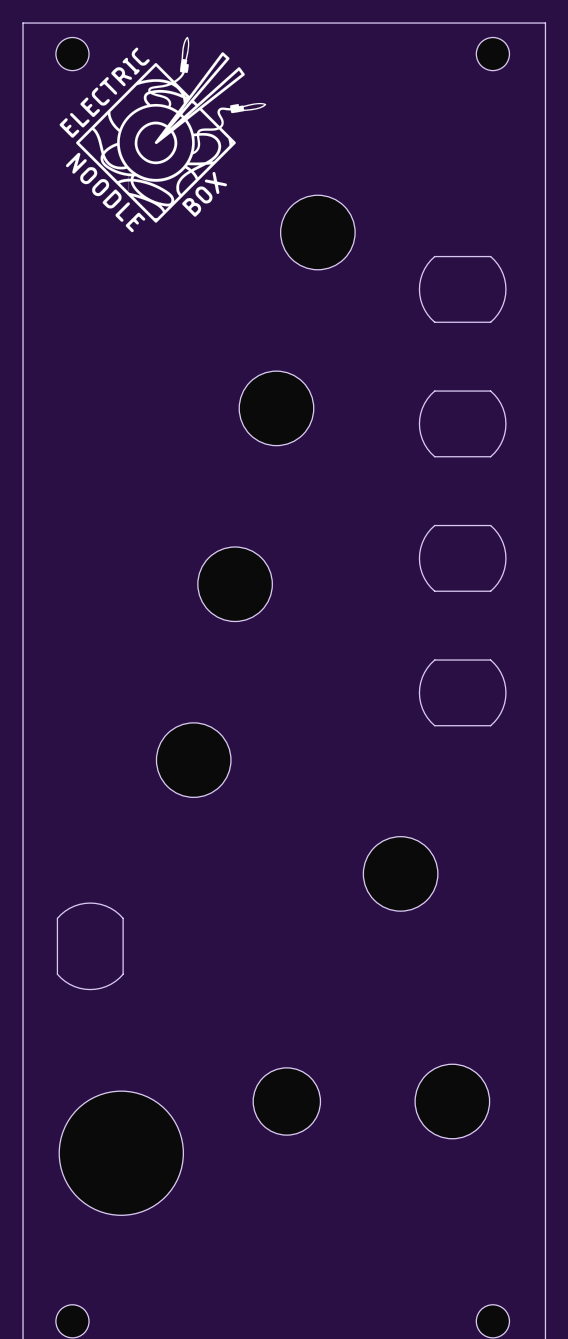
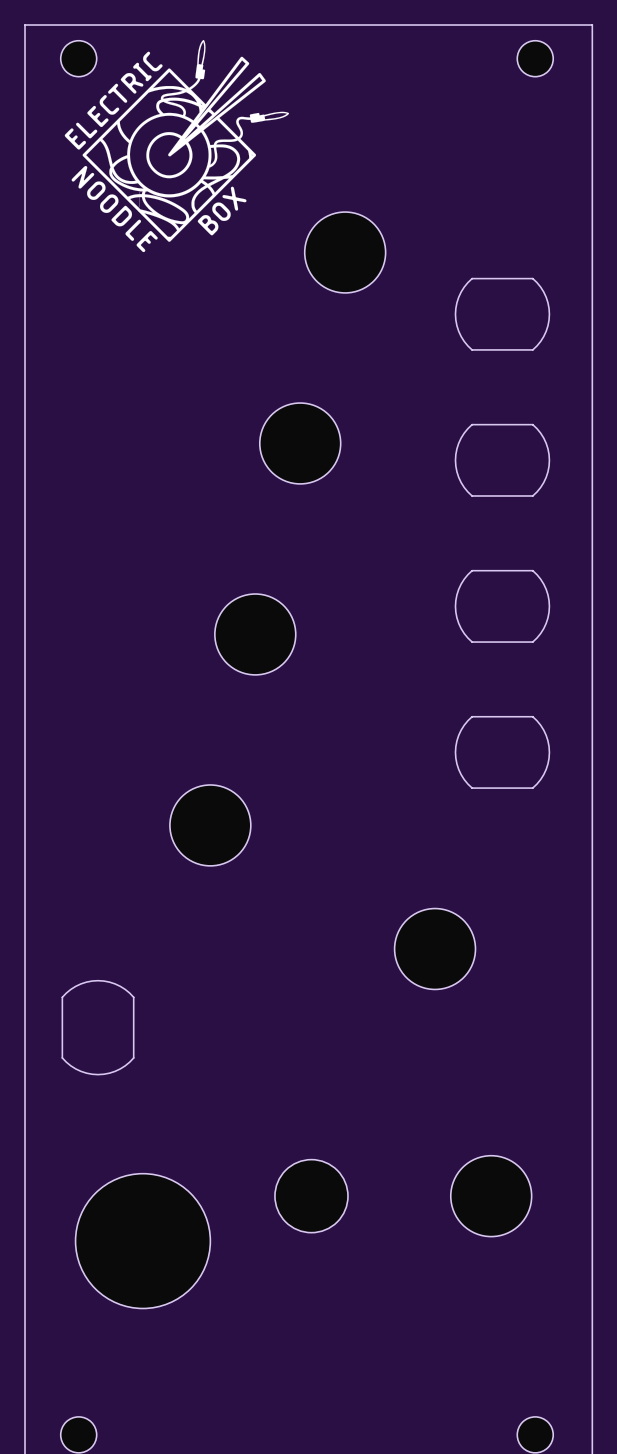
part position: (121, 1153) -> (142, 1241)

